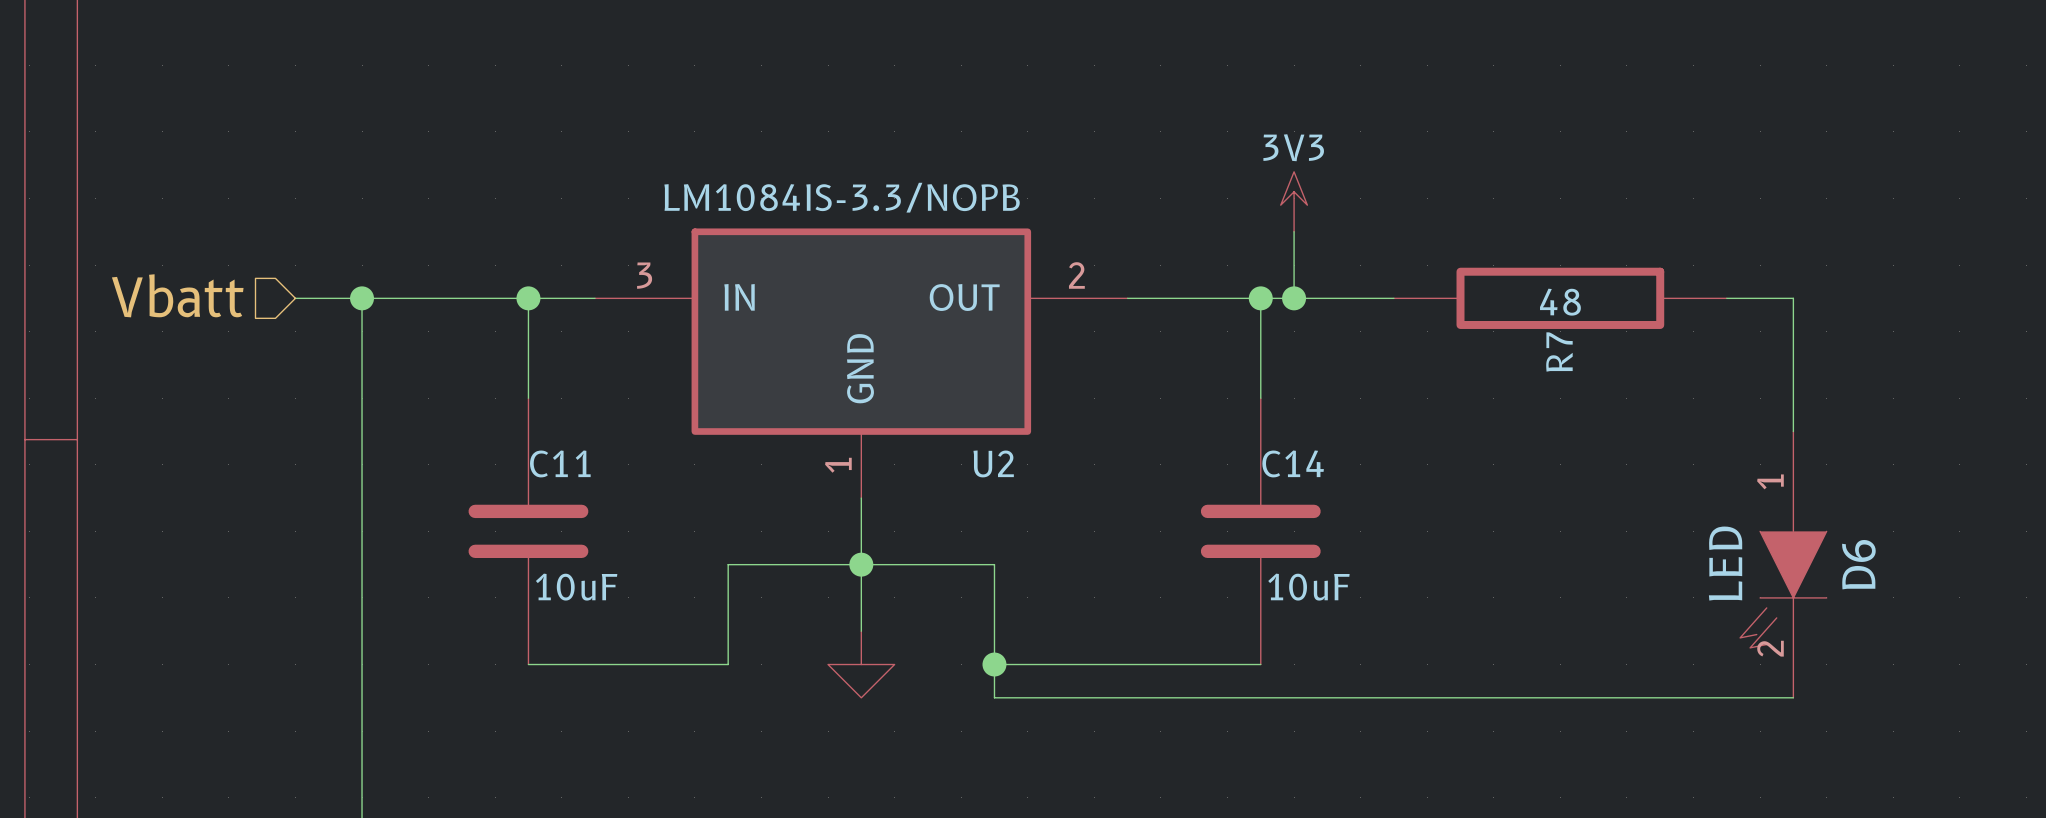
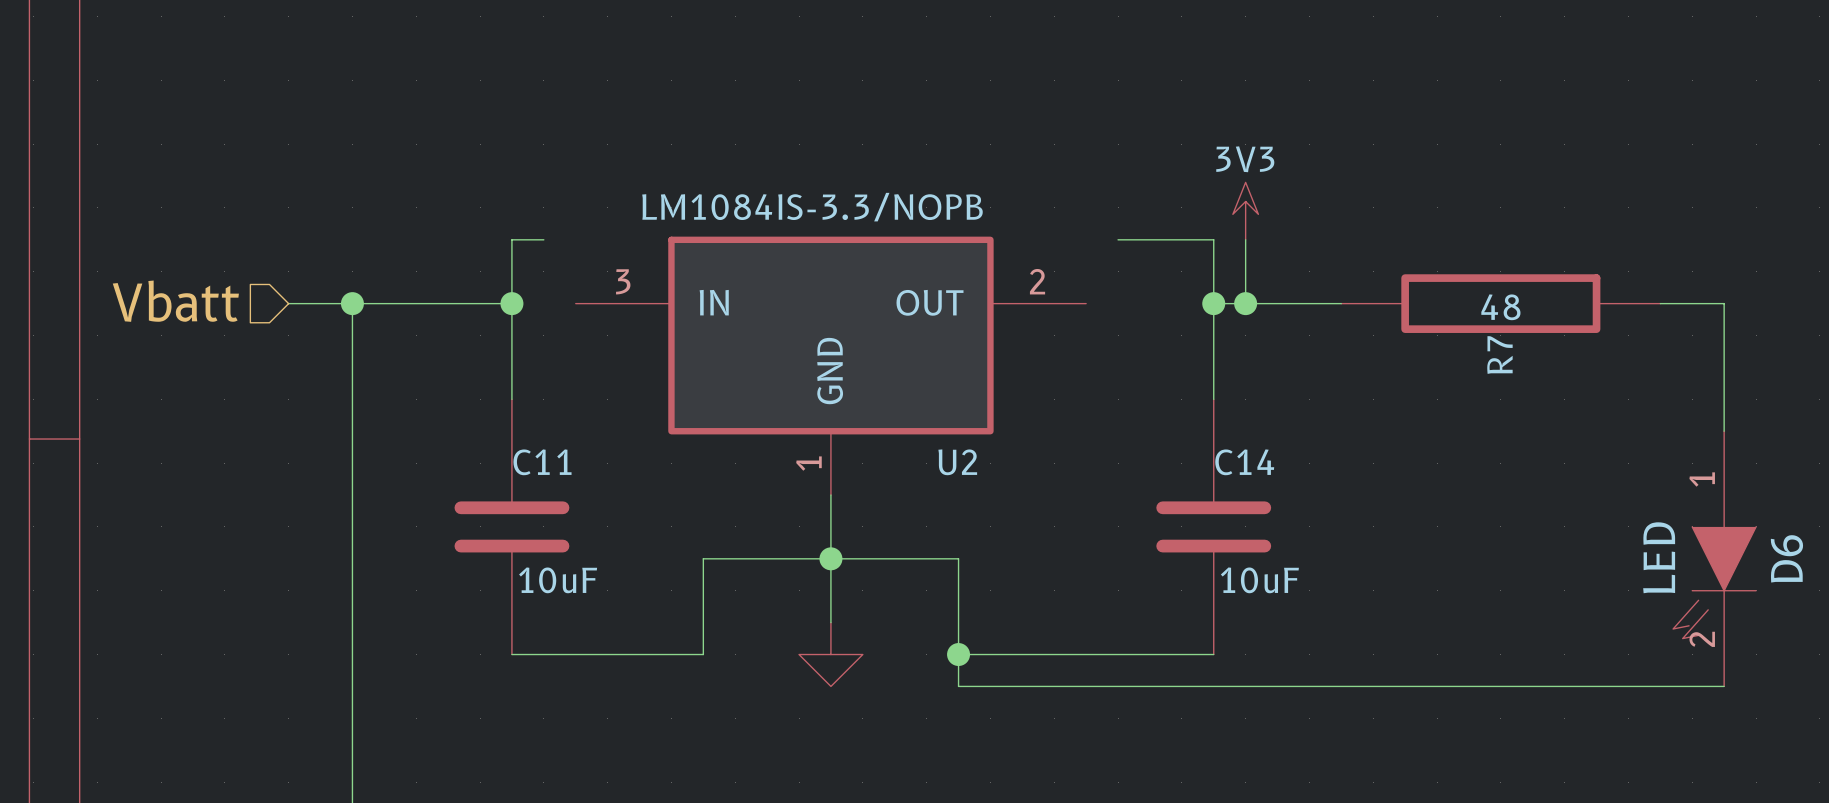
wire: (528, 298) (595, 298) -> (511, 303) (511, 239) (543, 239)
wire: (1127, 298) (1260, 298) -> (1118, 239) (1213, 239) (1213, 303)

